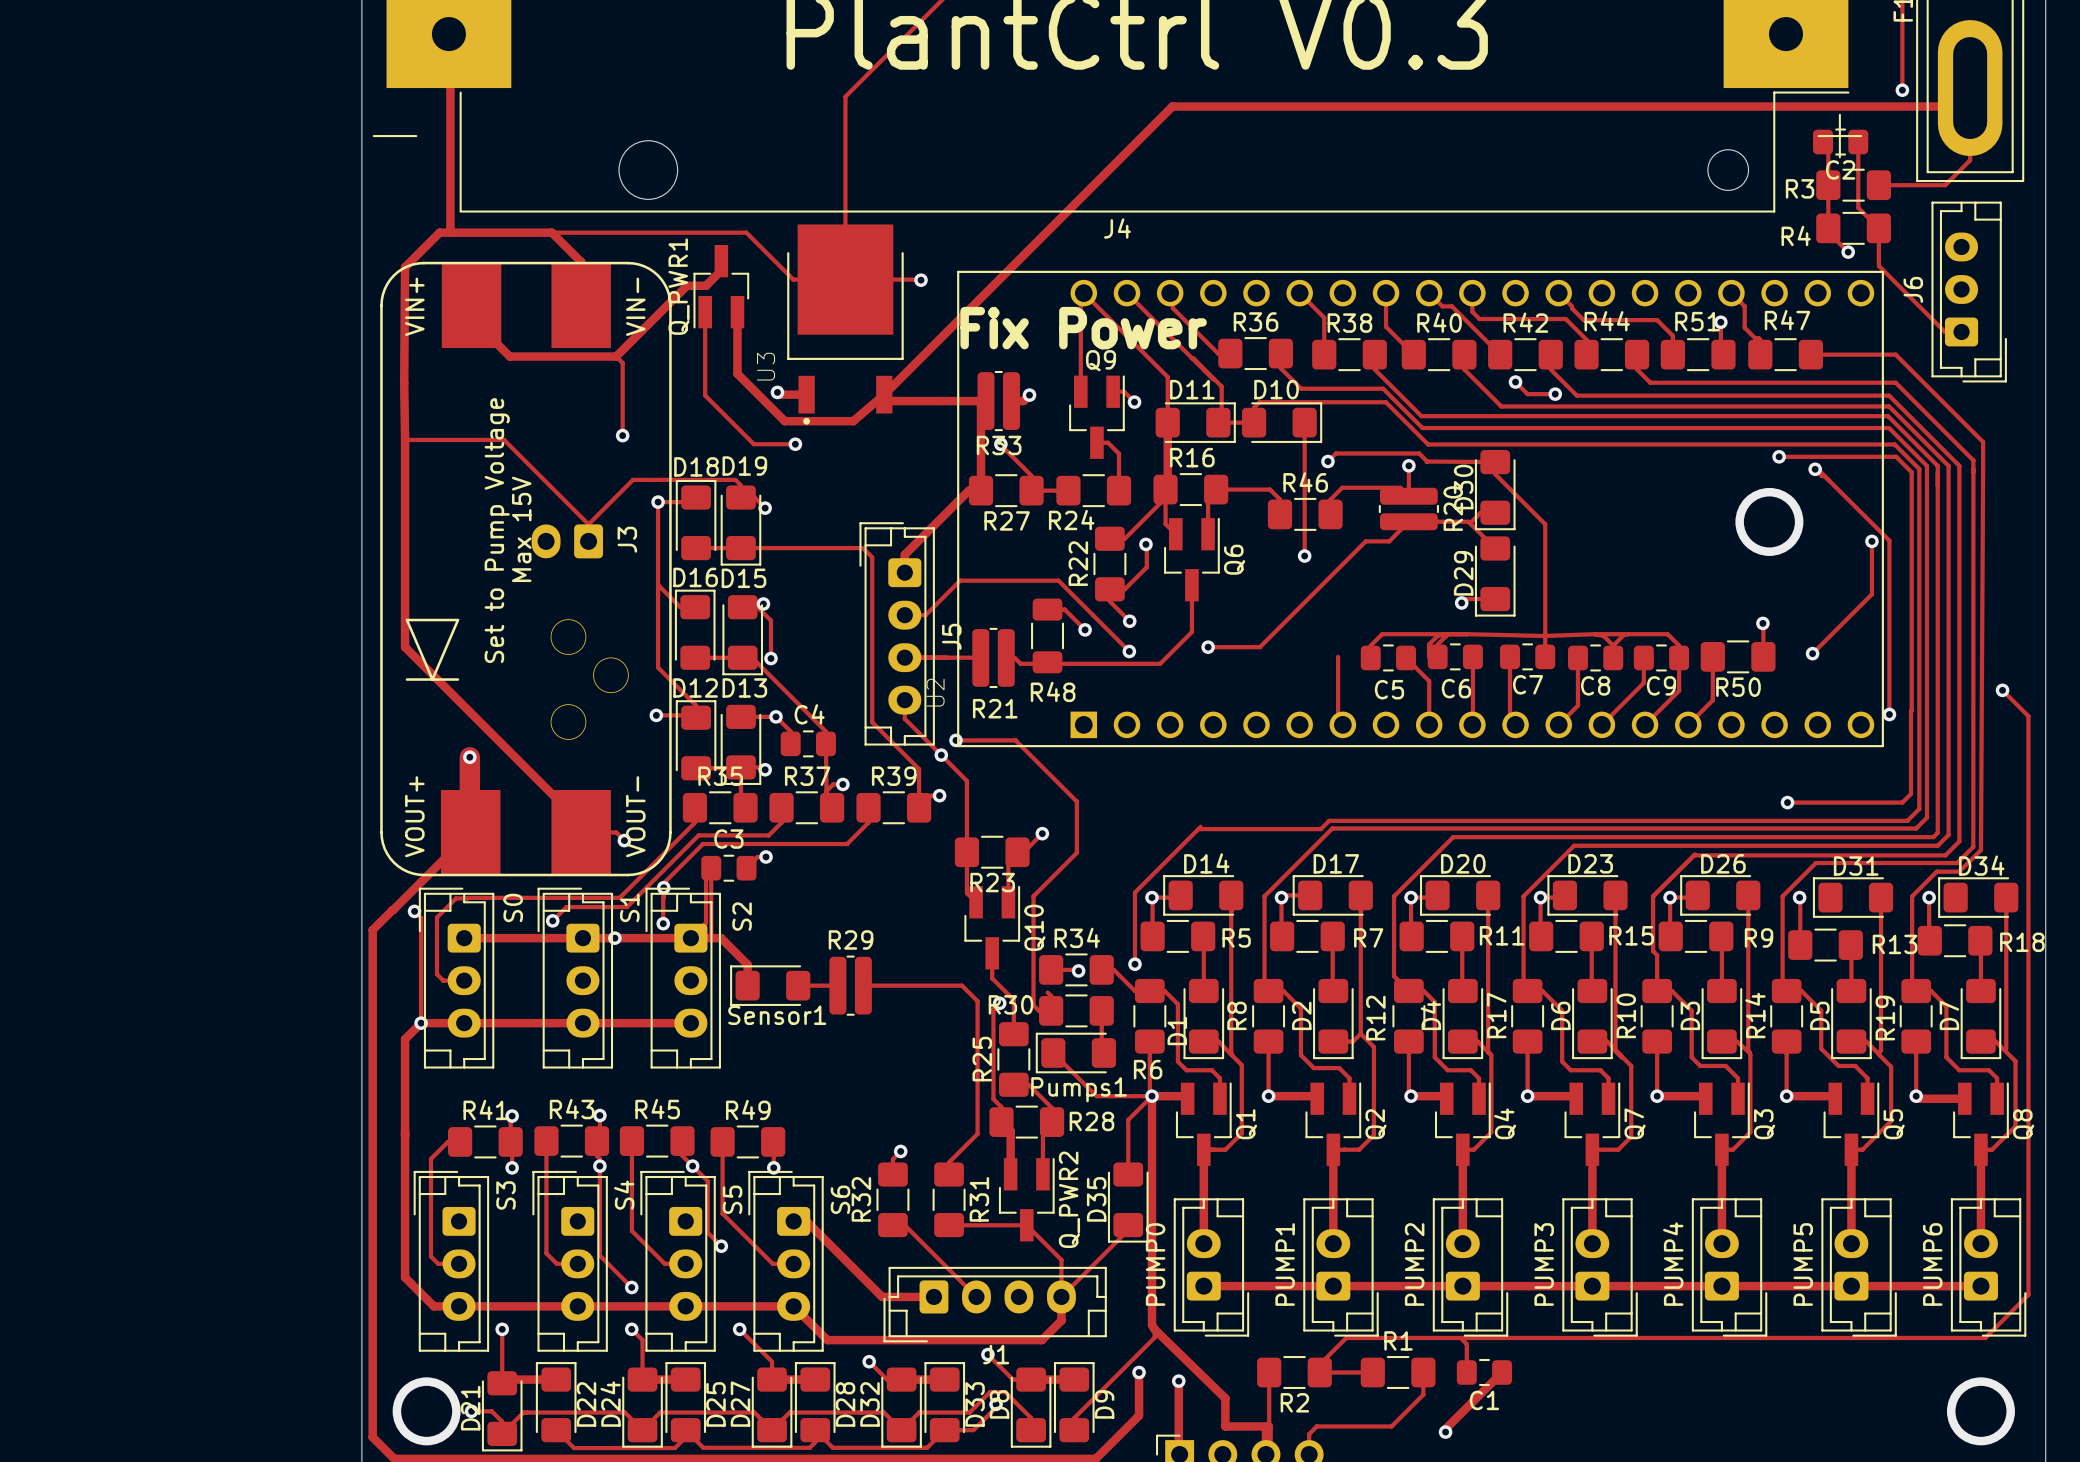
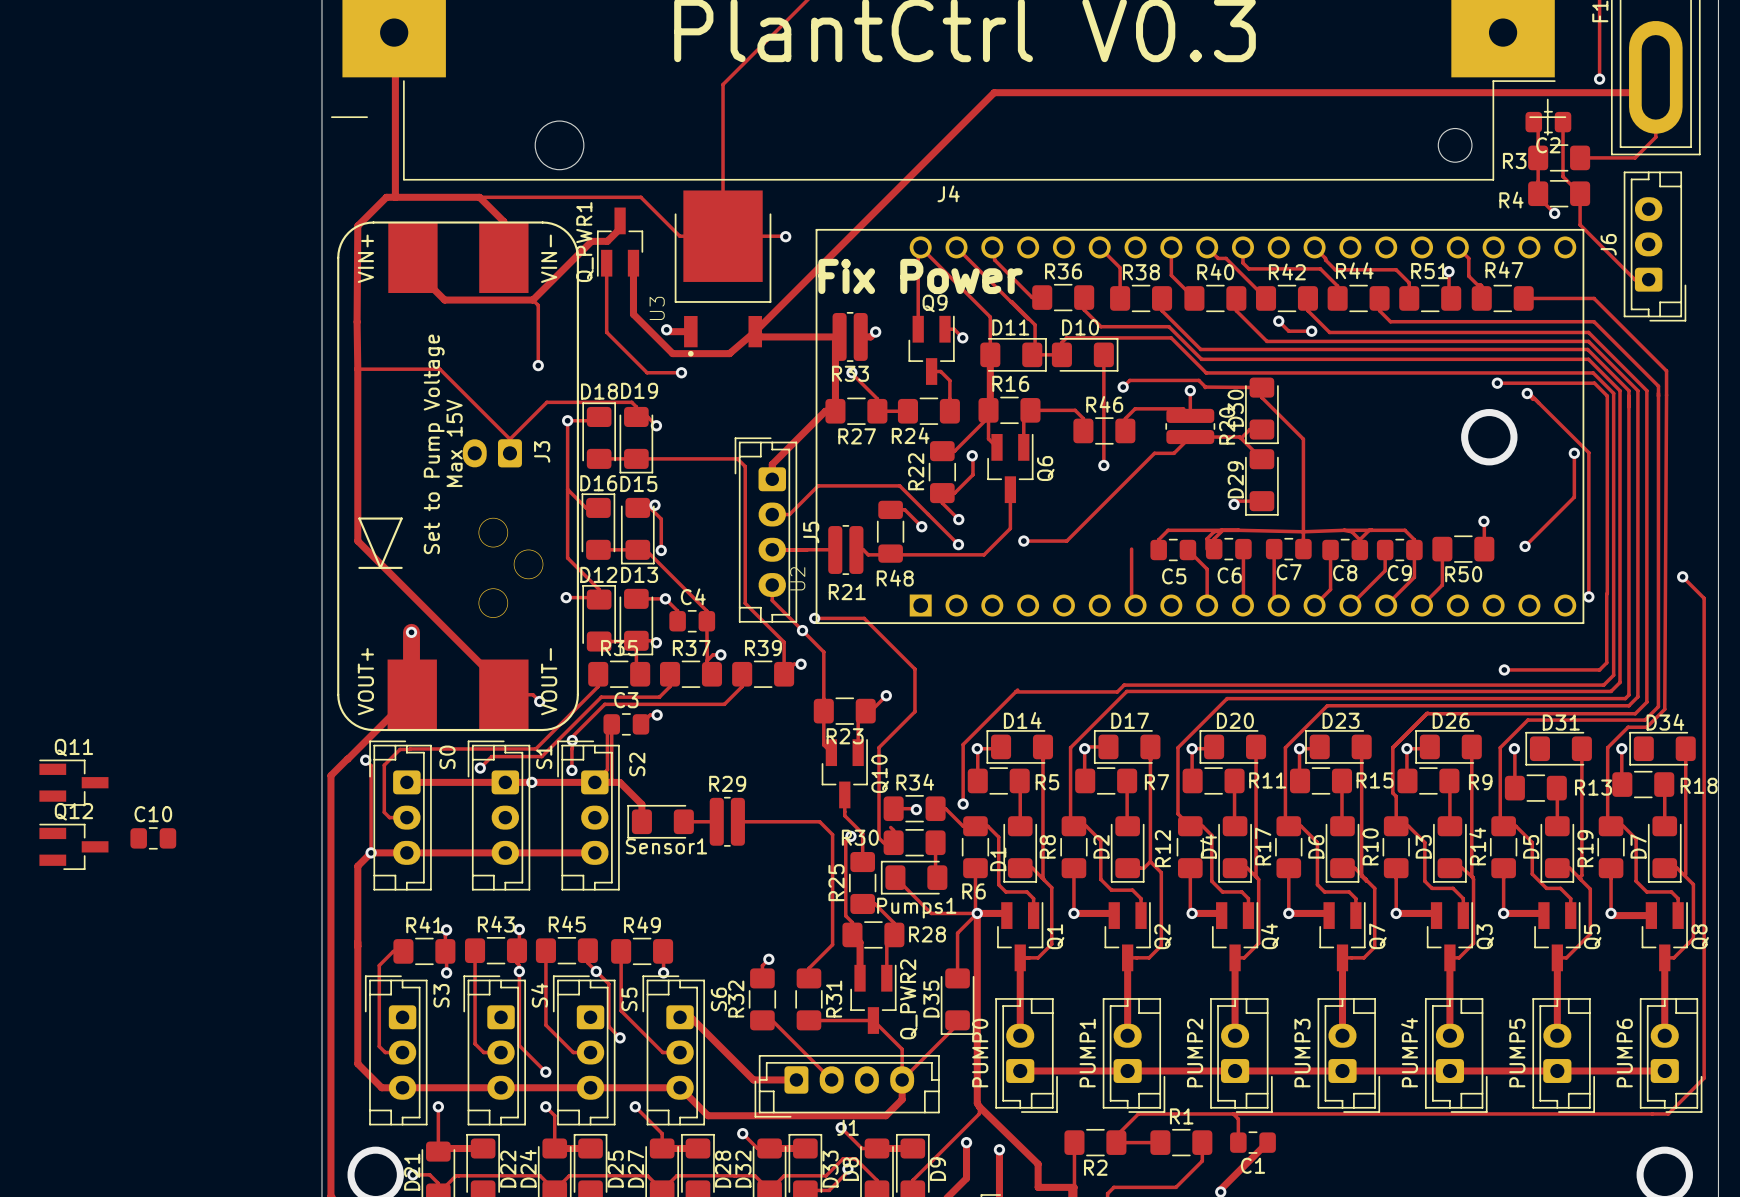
Q11: none -> (73, 782)
C10: none -> (153, 838)
Q12: none -> (73, 846)

